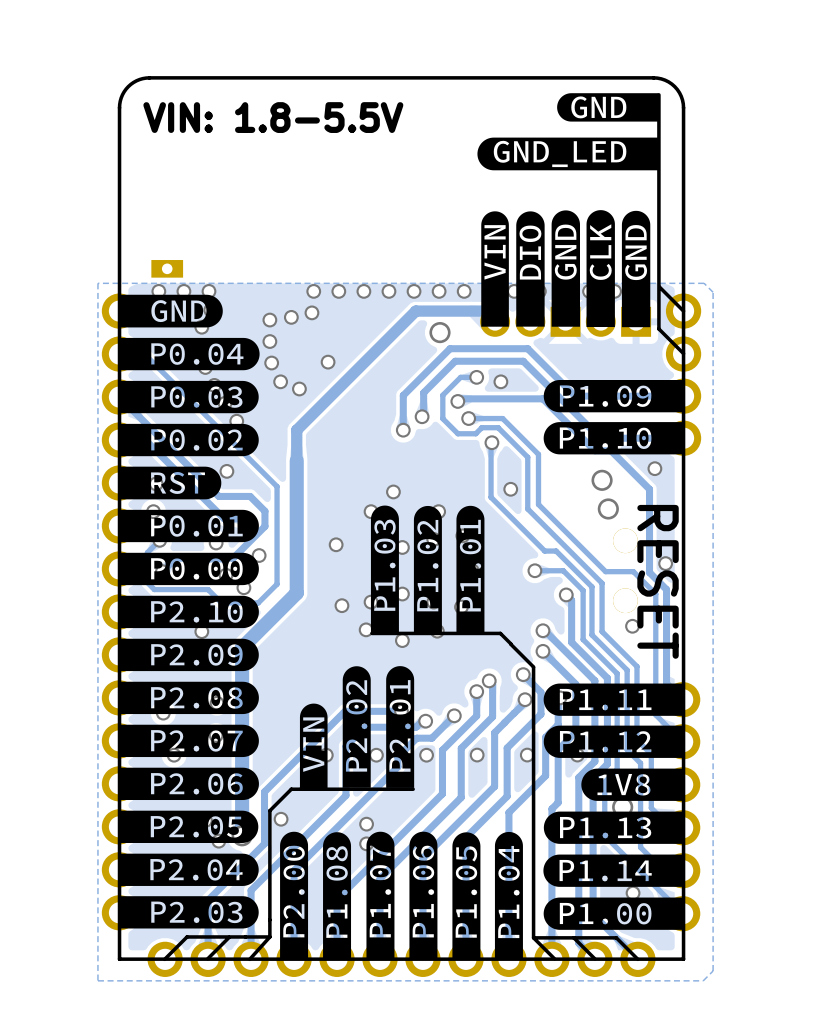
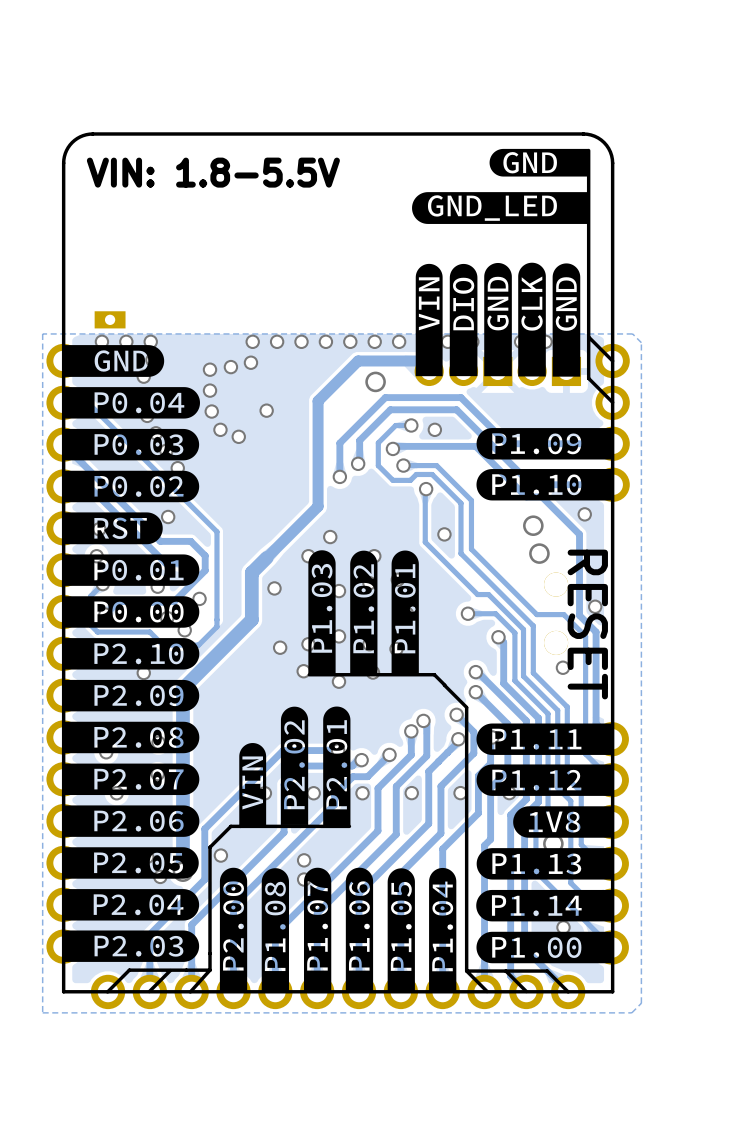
track: (422, 311) (415, 311) (296, 430) (296, 593) -> (358, 360) (318, 401) (318, 506) (251, 572) (251, 619) (236, 635)

